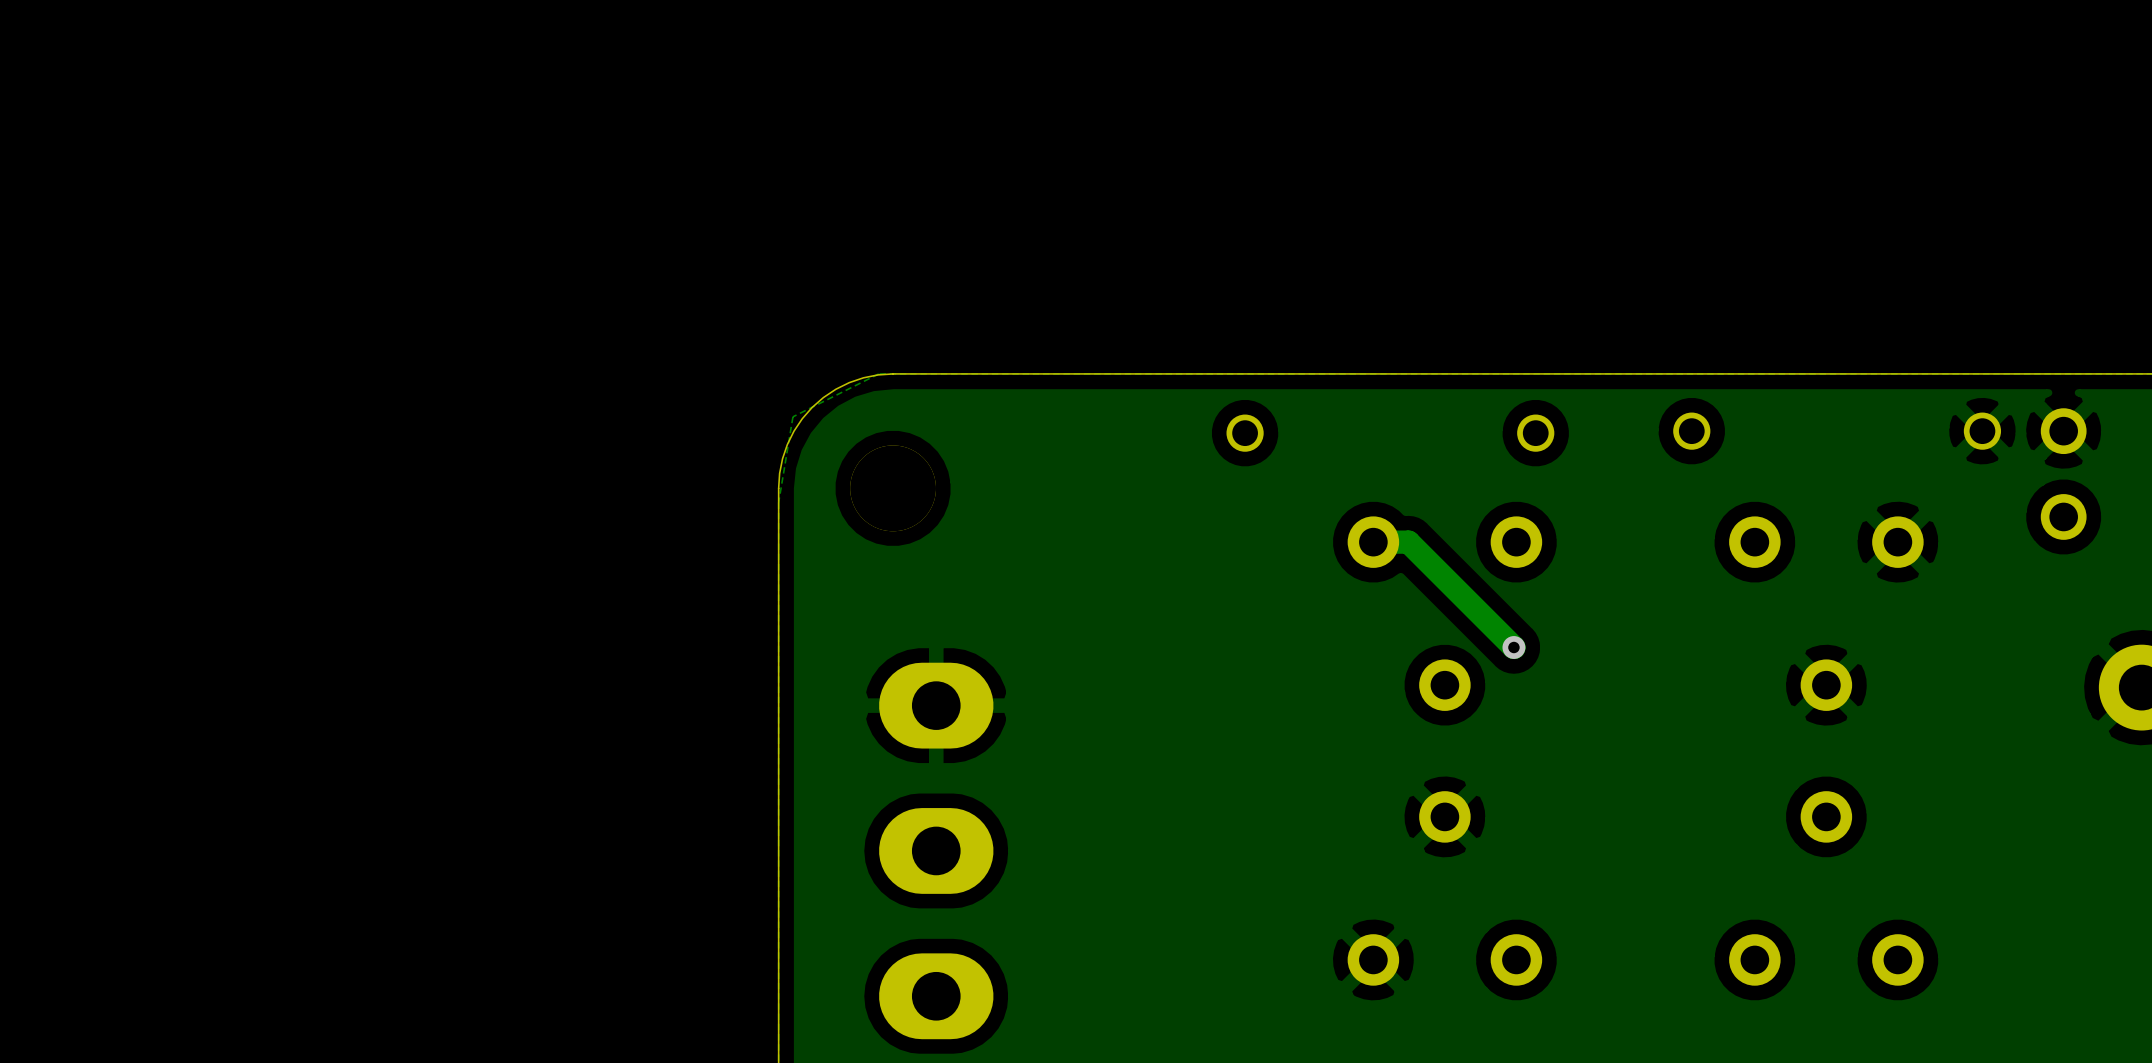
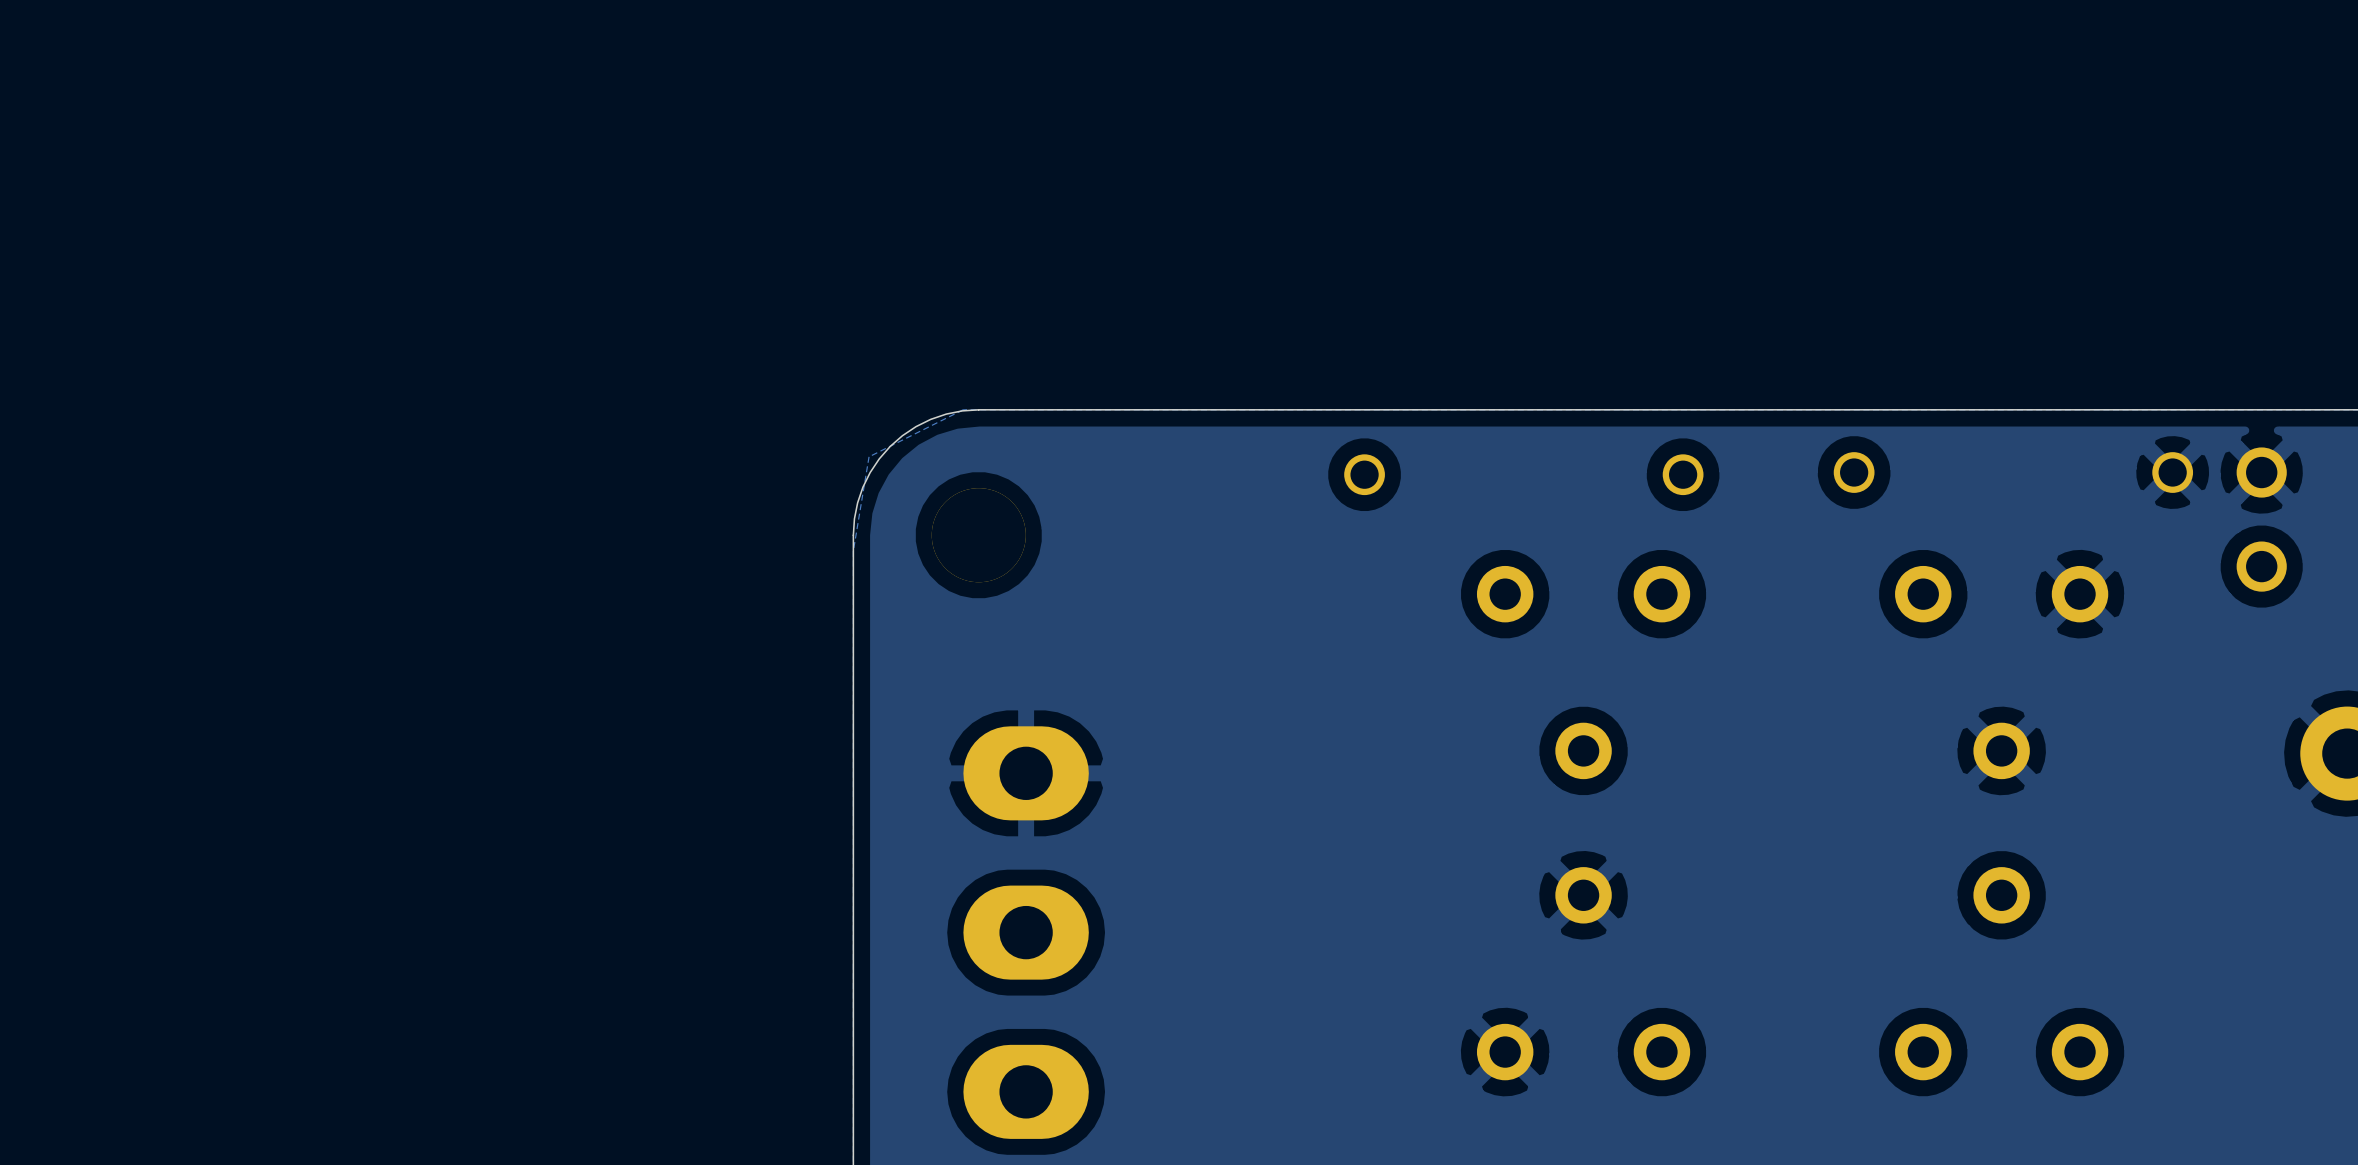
track: (1373, 542) (1408, 542) (1513, 647) -> none
via: (1513, 647) -> none

